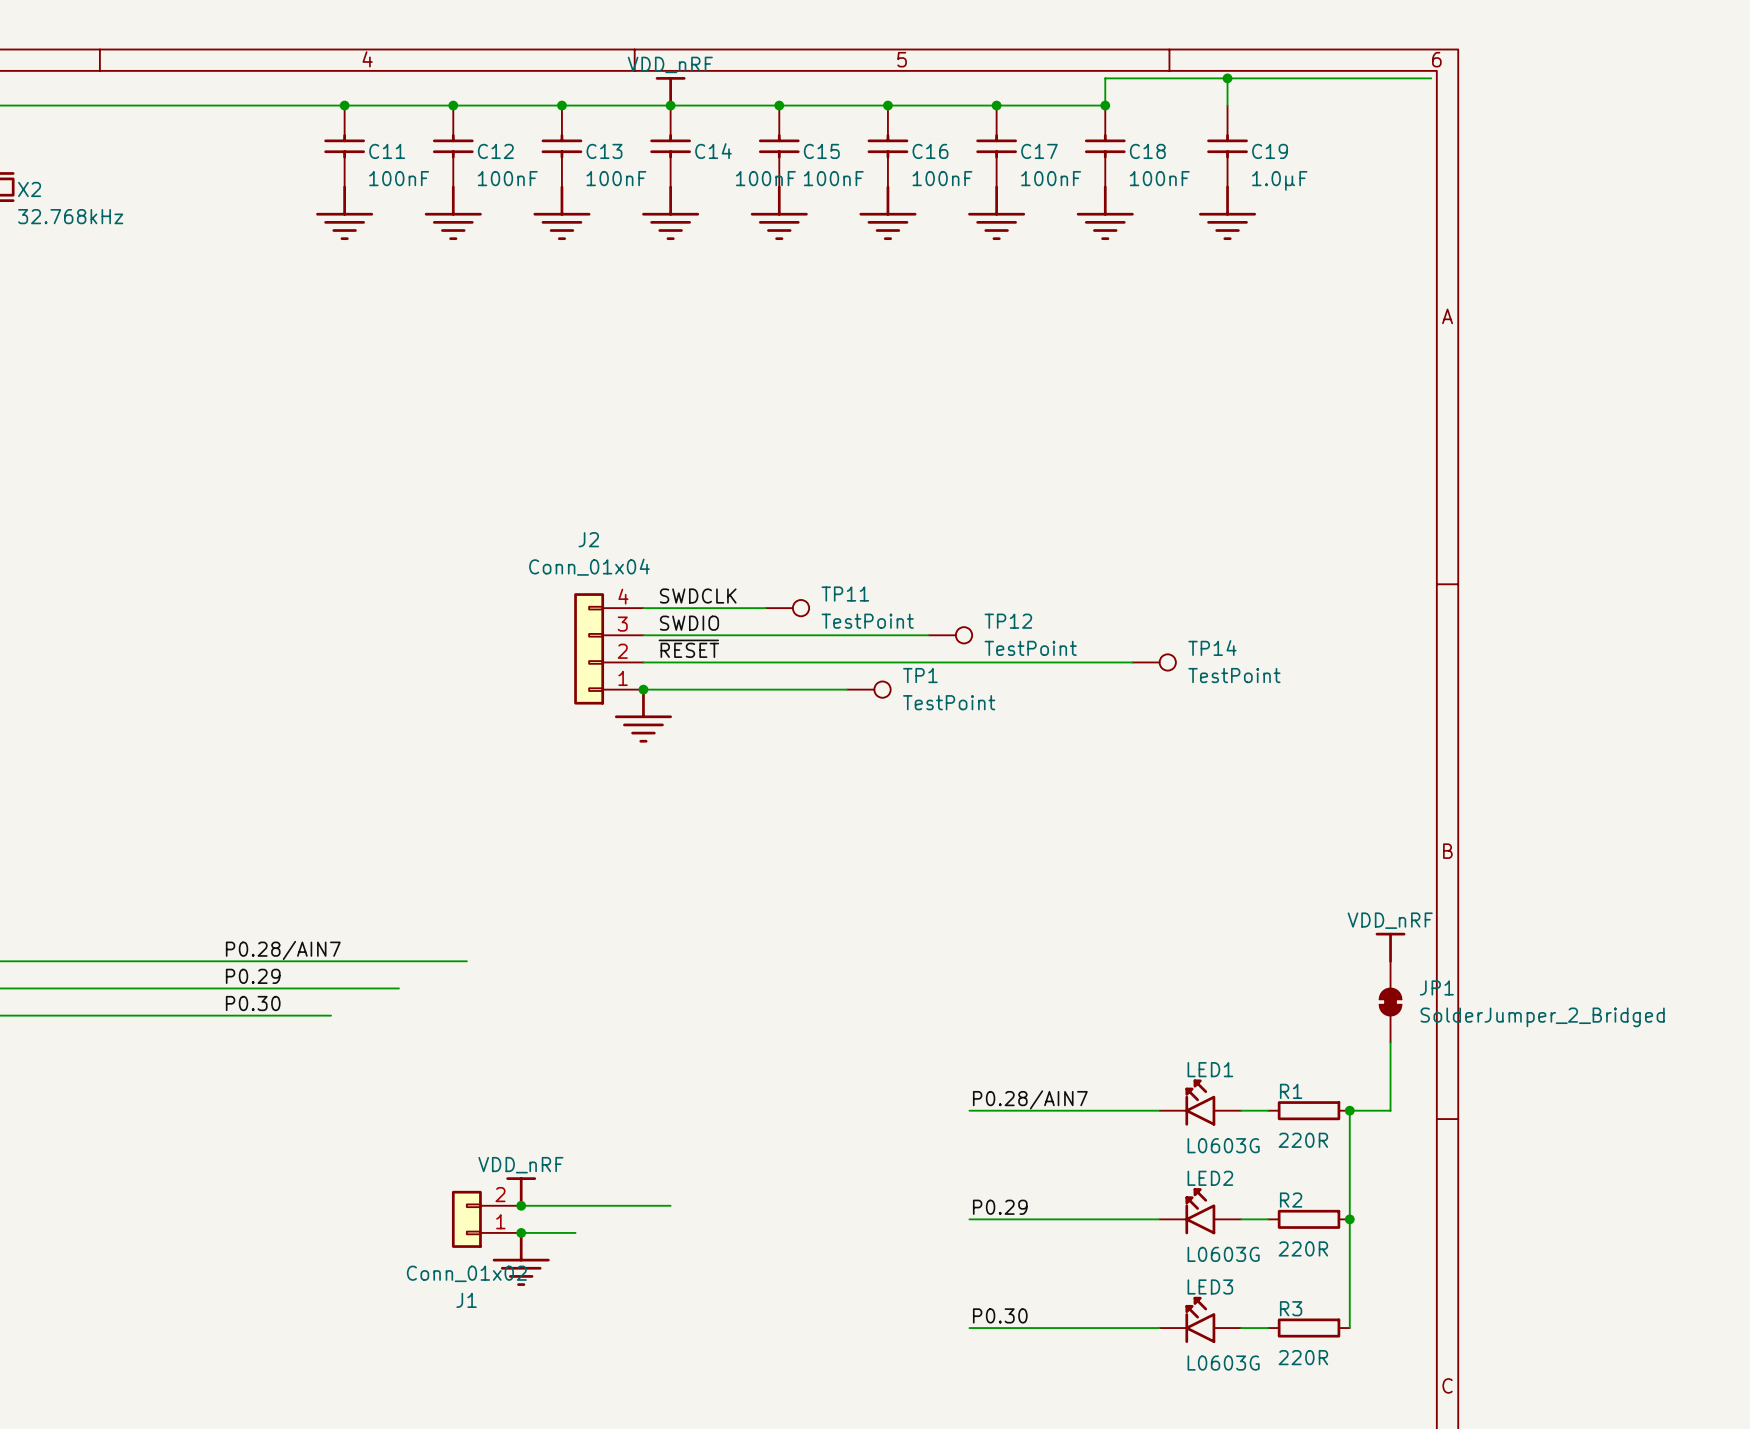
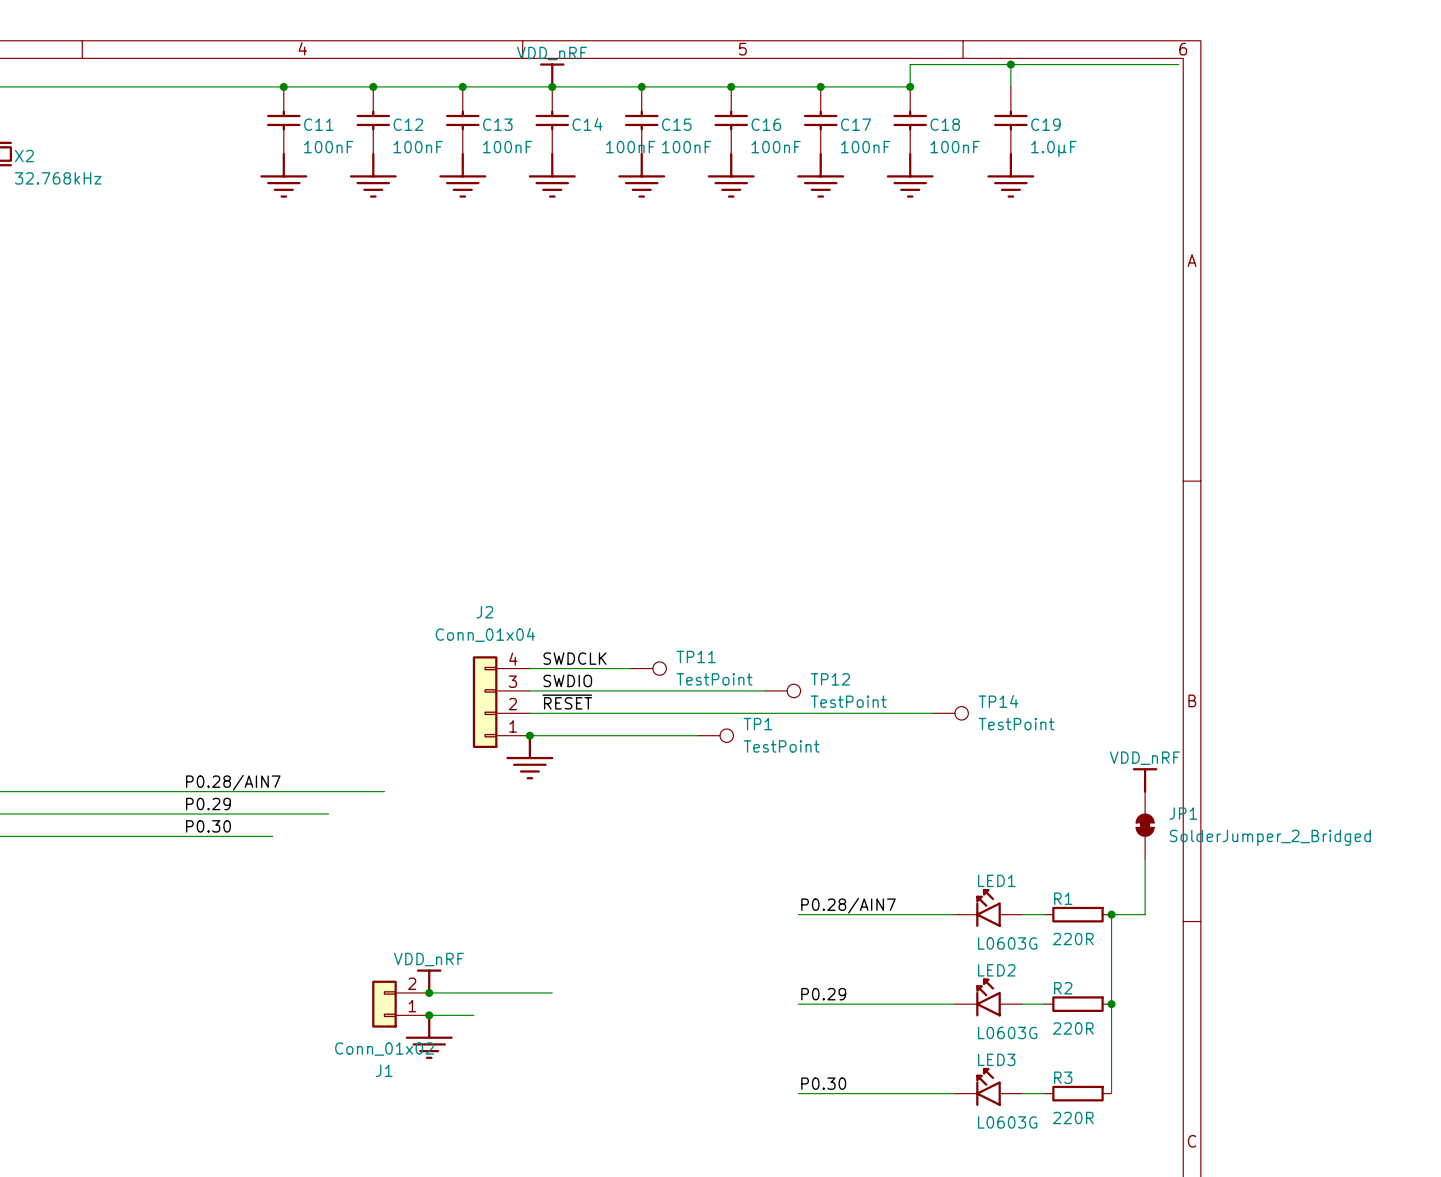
label position: SWDCLK (698, 596) -> SWDCLK (574, 658)
wire: (643, 608) (765, 608) -> (529, 668) (630, 668)
TP11 position: (787, 608) -> (648, 668)
label position: SWDIO (689, 623) -> SWDIO (567, 680)
wire: (643, 635) (928, 635) -> (529, 690) (764, 690)
TP12 position: (950, 635) -> (782, 690)
J2 position: (608, 648) -> (501, 702)
label position: ~{RESET} (688, 648) -> ~{RESET} (567, 702)
wire: (643, 662) (1132, 662) -> (529, 713) (932, 713)
TP14 position: (1154, 662) -> (950, 713)
wire: (643, 689) (847, 689) -> (529, 735) (697, 735)
junction: (643, 689) -> none
TP1 position: (868, 689) -> (715, 735)
power symbol position: (643, 715) -> (529, 756)
junction: none -> (529, 735)

